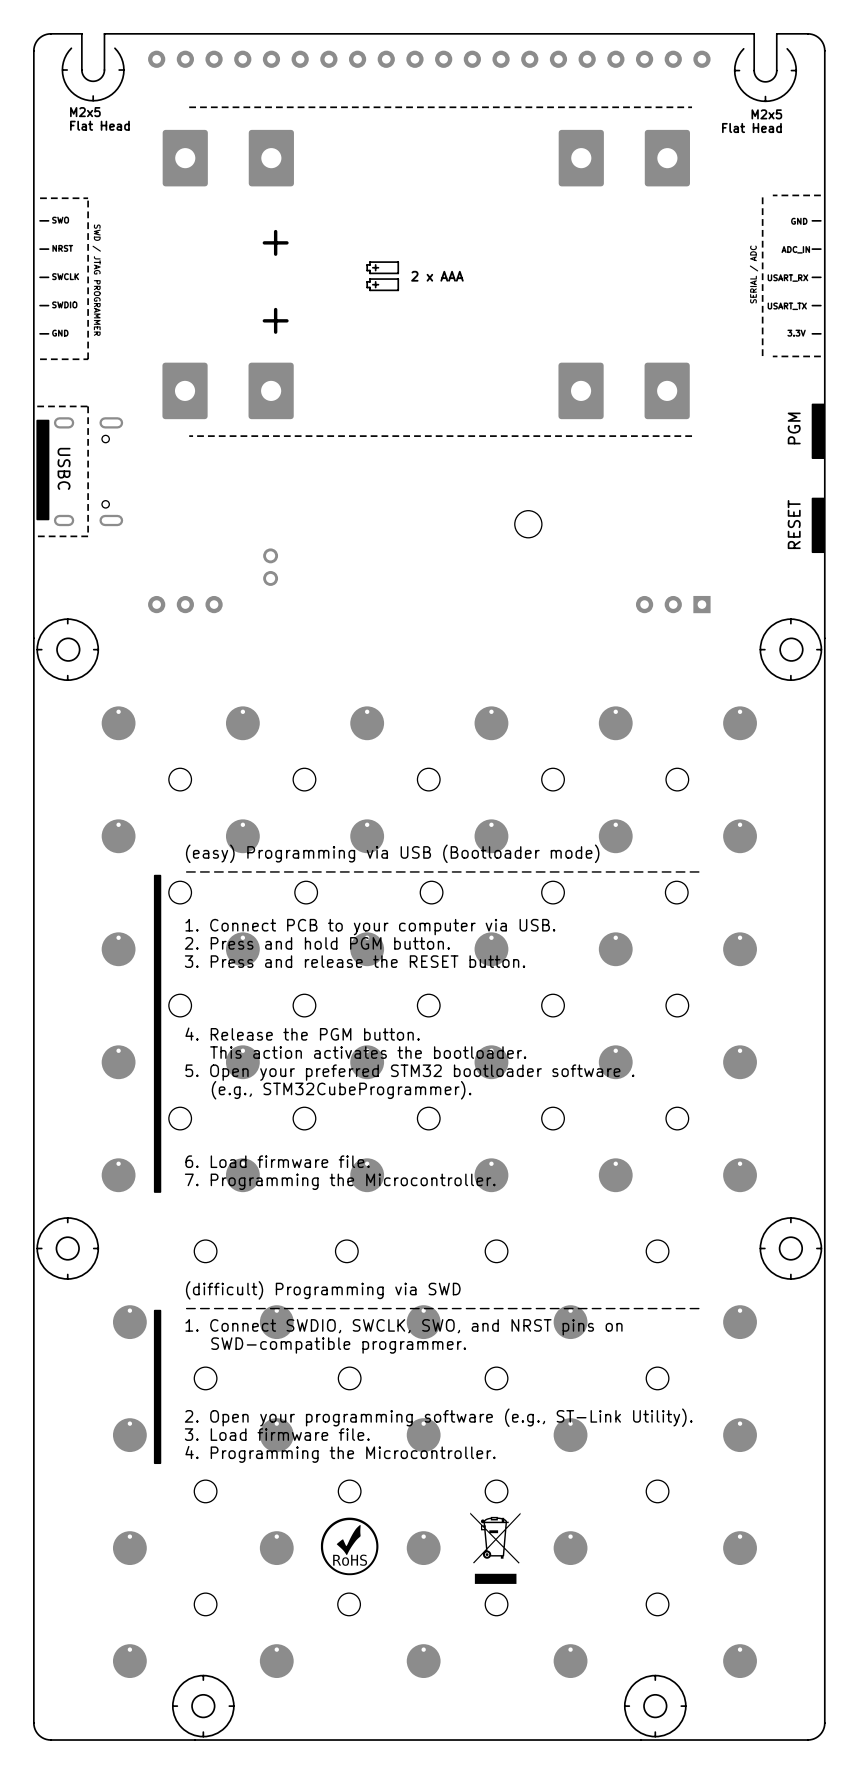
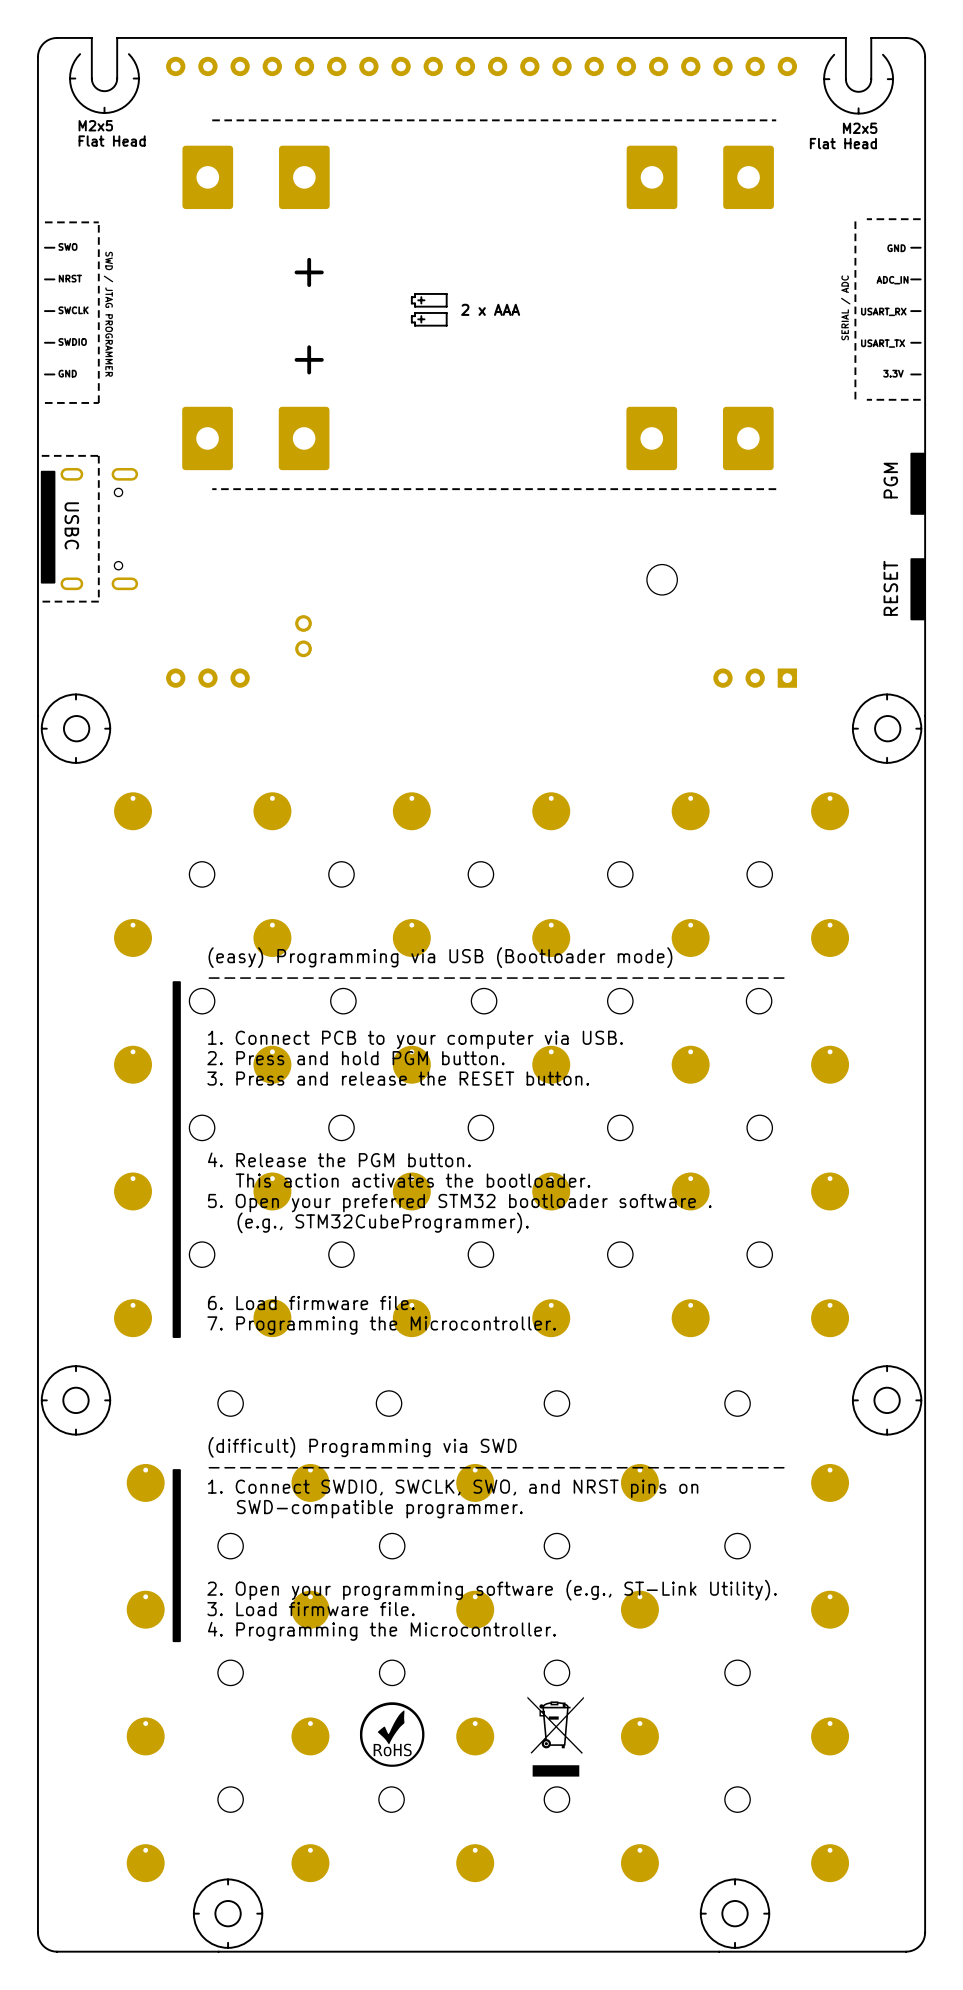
round board edge position: (528, 524) -> (662, 579)

